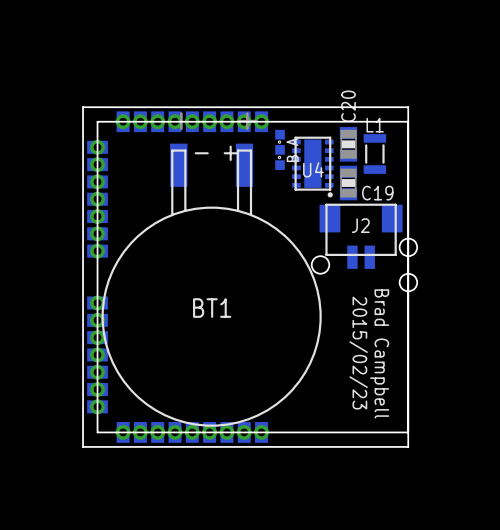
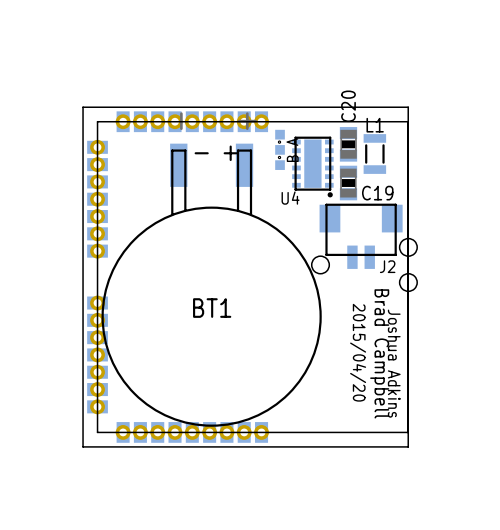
U4 name position: U4 (313, 169) -> U4 (290, 198)
J2 name position: J2 (360, 225) -> J2 (387, 266)
text: 2015/02/23 (358, 353) -> 2015/04/20 (358, 352)
text: none -> Joshua Adkins (394, 363)

